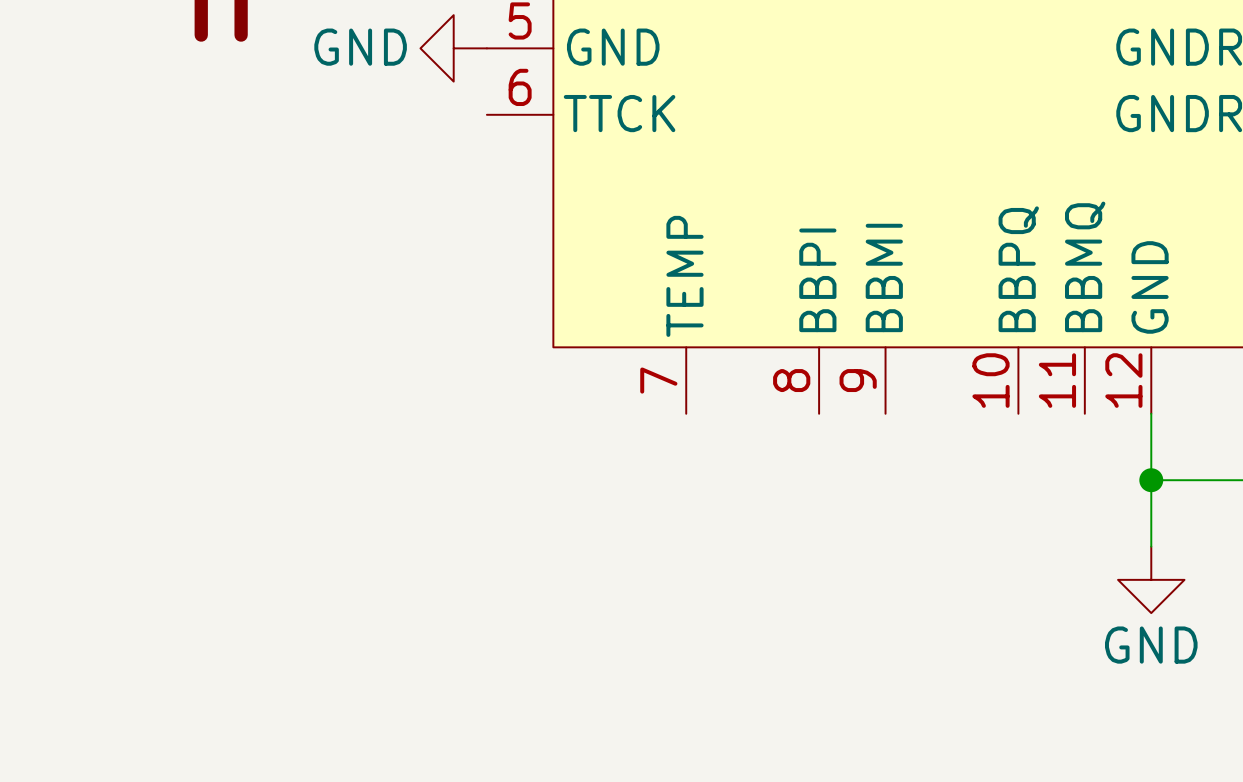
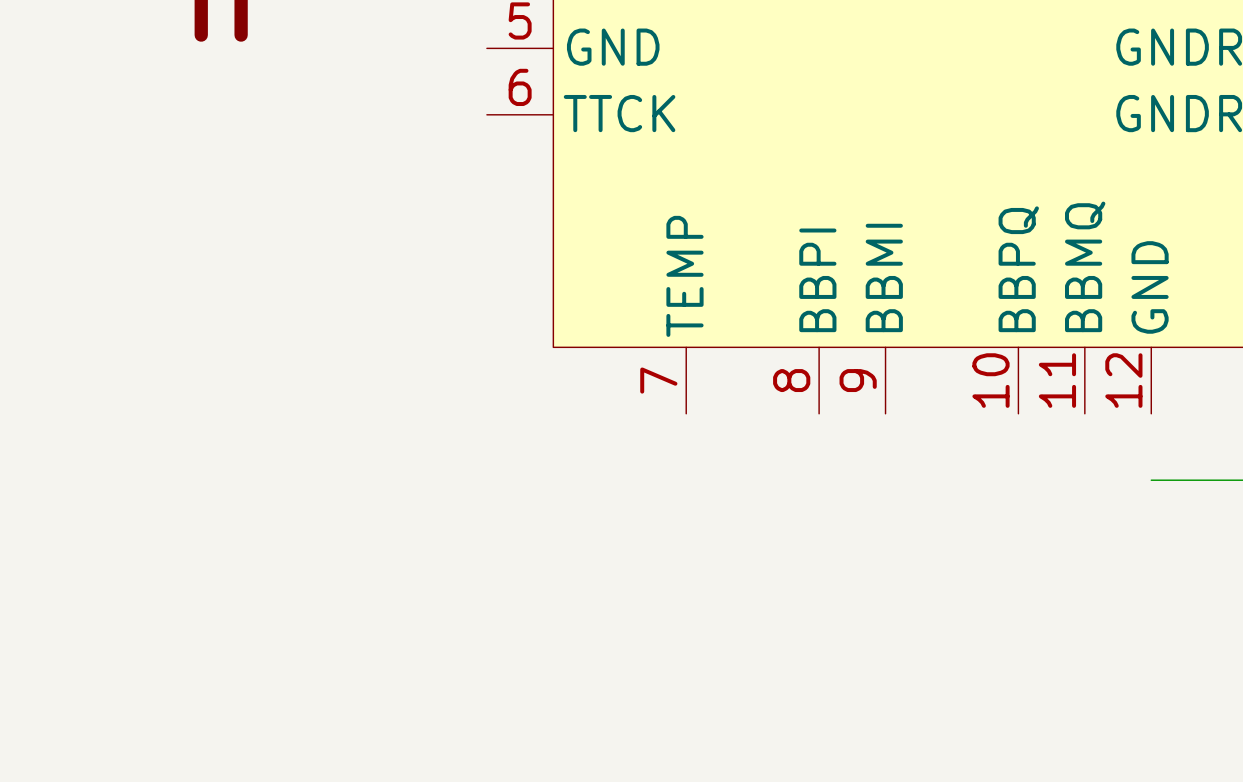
power symbol: GND (453, 48) -> none
wire: (1151, 413) (1151, 546) -> none
junction: (1151, 480) -> none
power symbol: GND (1151, 579) -> none

